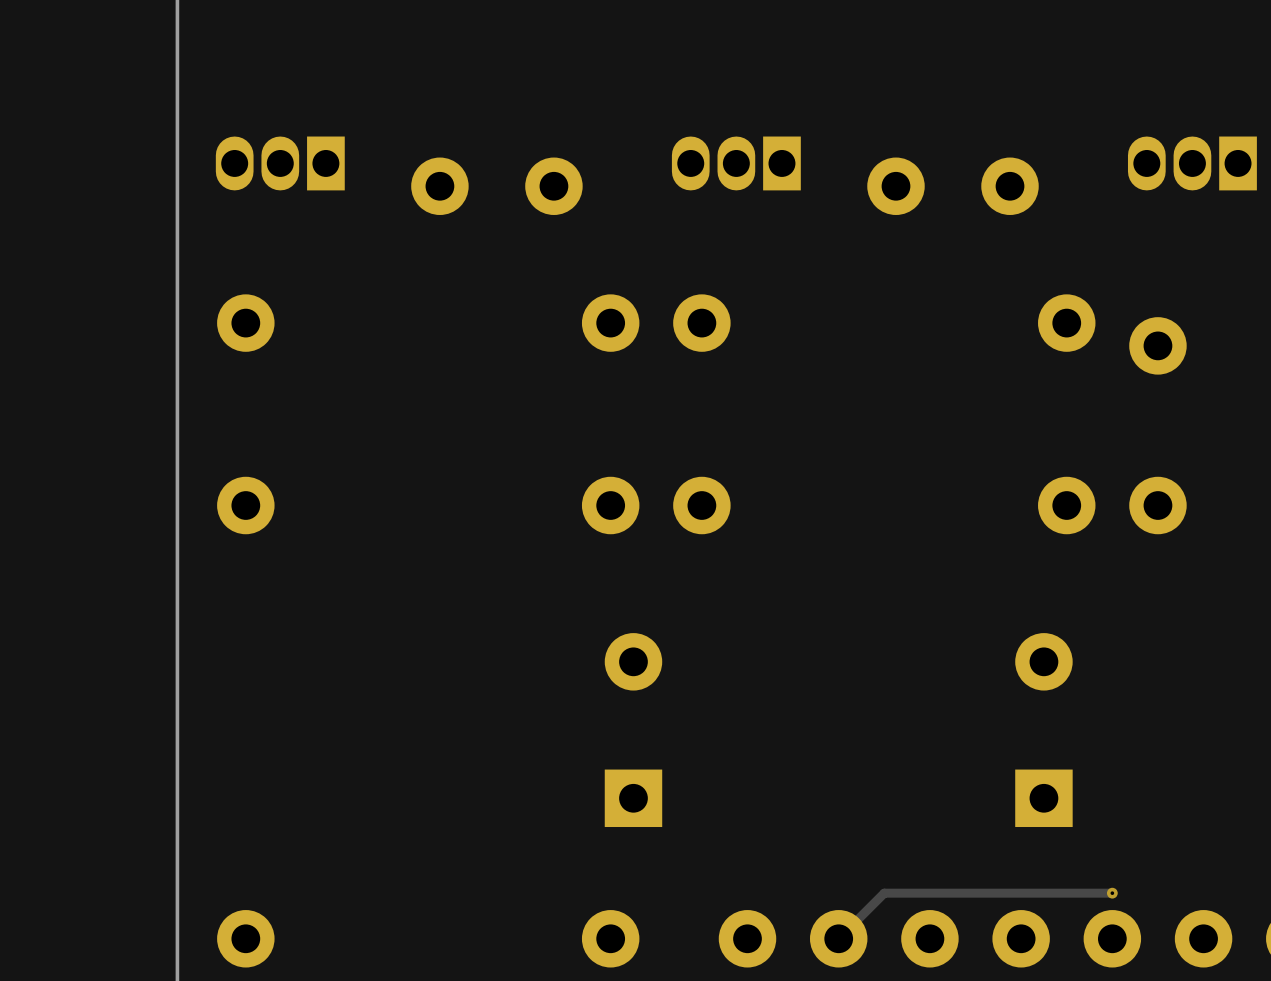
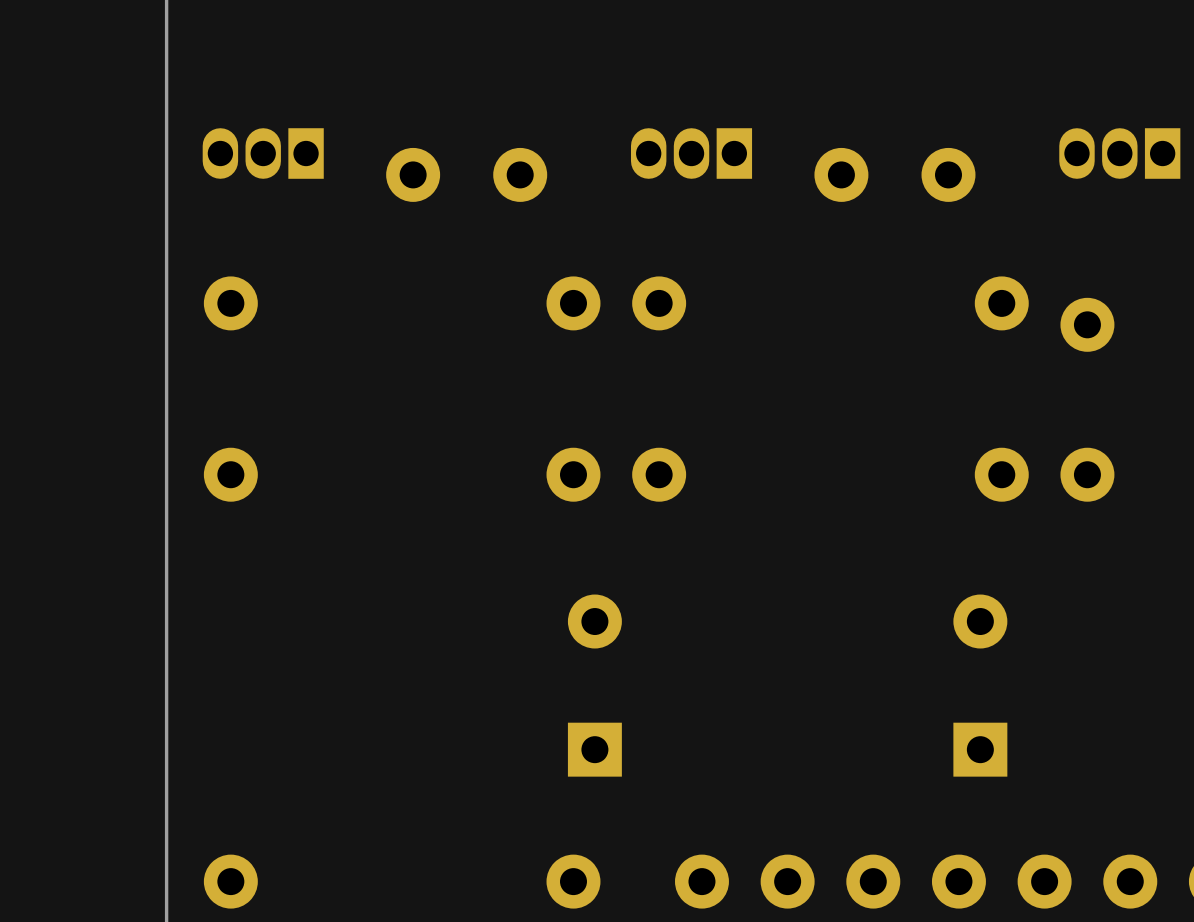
track: (1112, 893) (884, 893) (838, 938) -> none
via: (1112, 893) -> none

